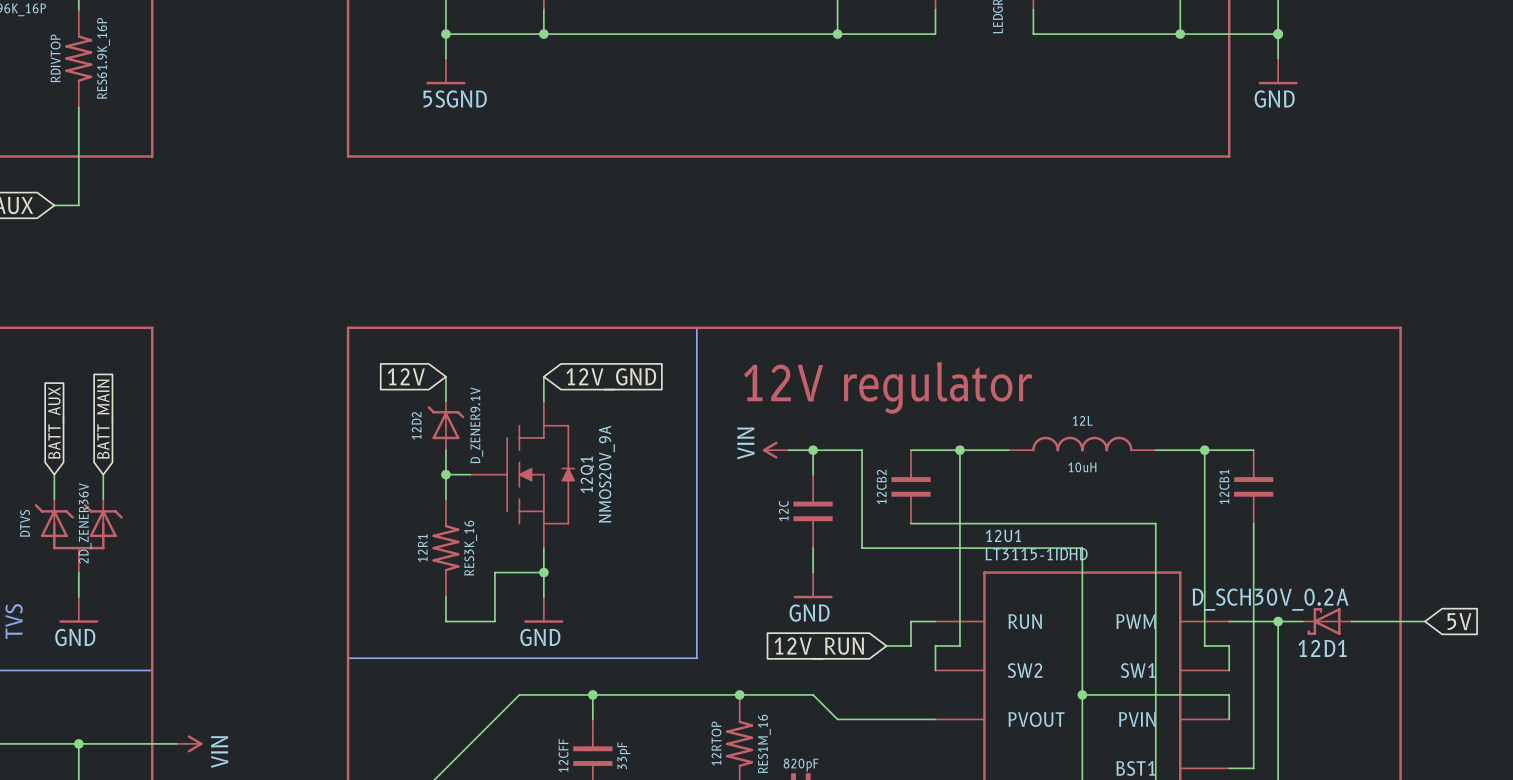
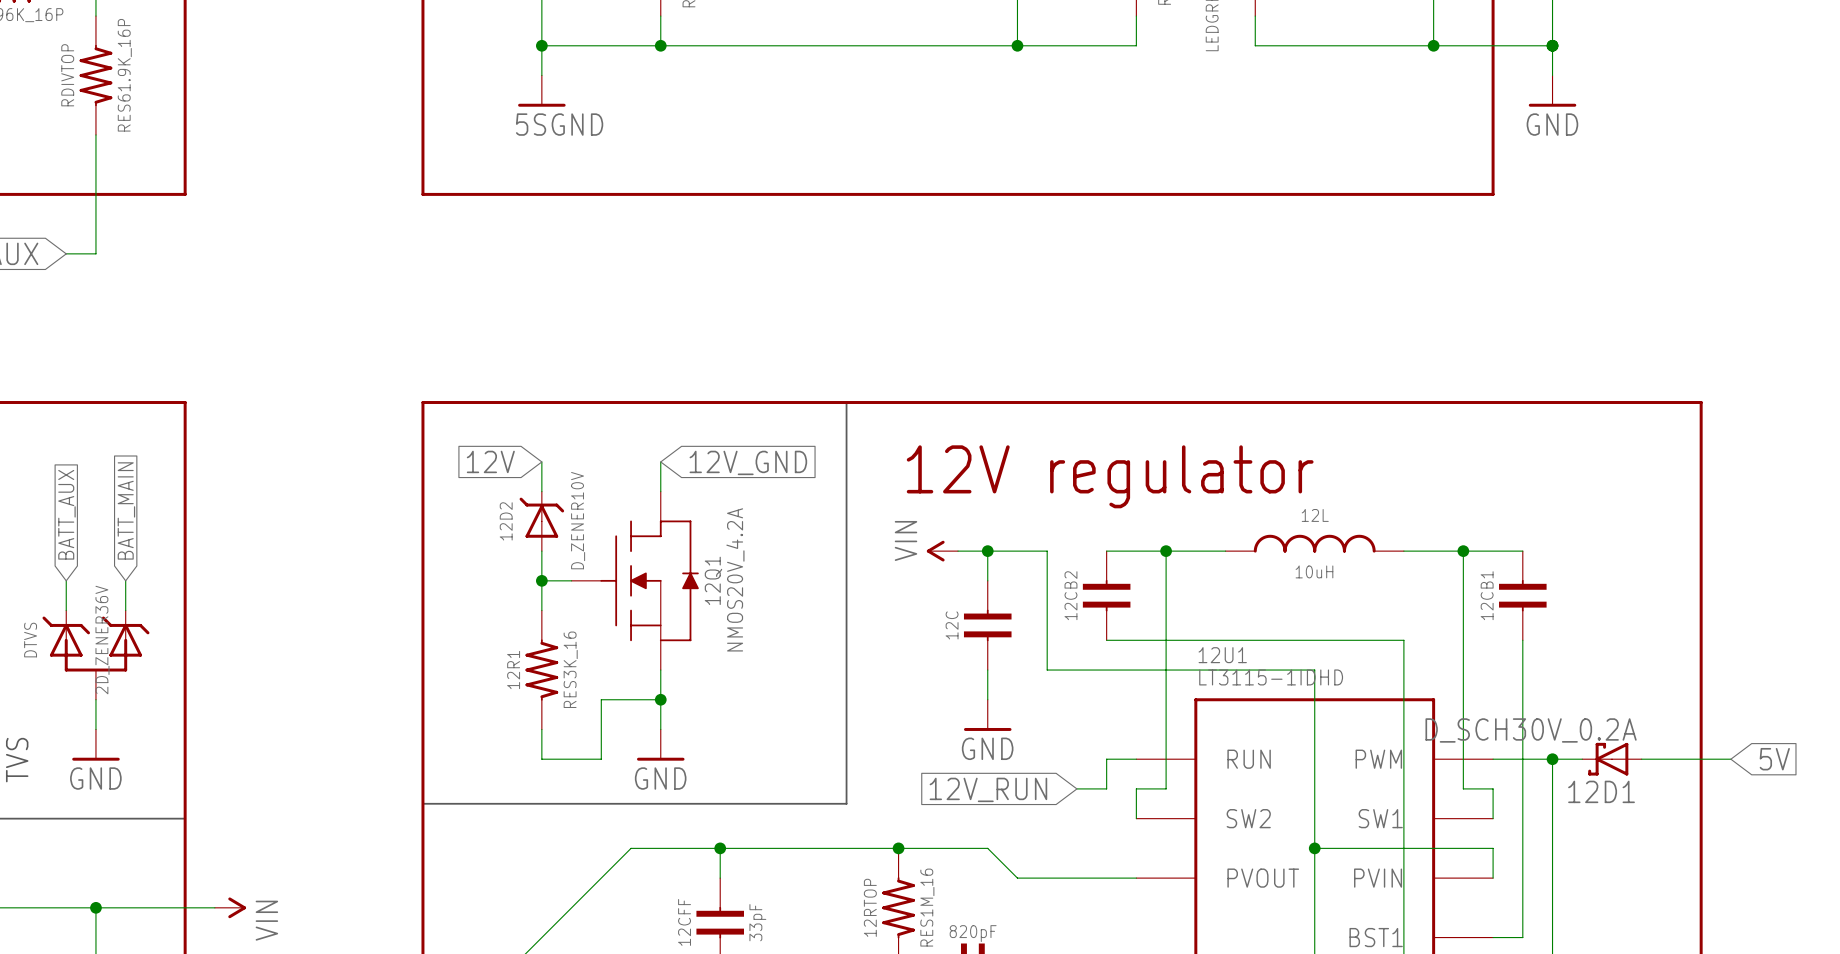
12D2 value: D_ZENER9.1V (476, 425) -> D_ZENER10V (578, 520)
12Q1 value: NMOS20V_9A (606, 474) -> NMOS20V_4.2A (735, 579)

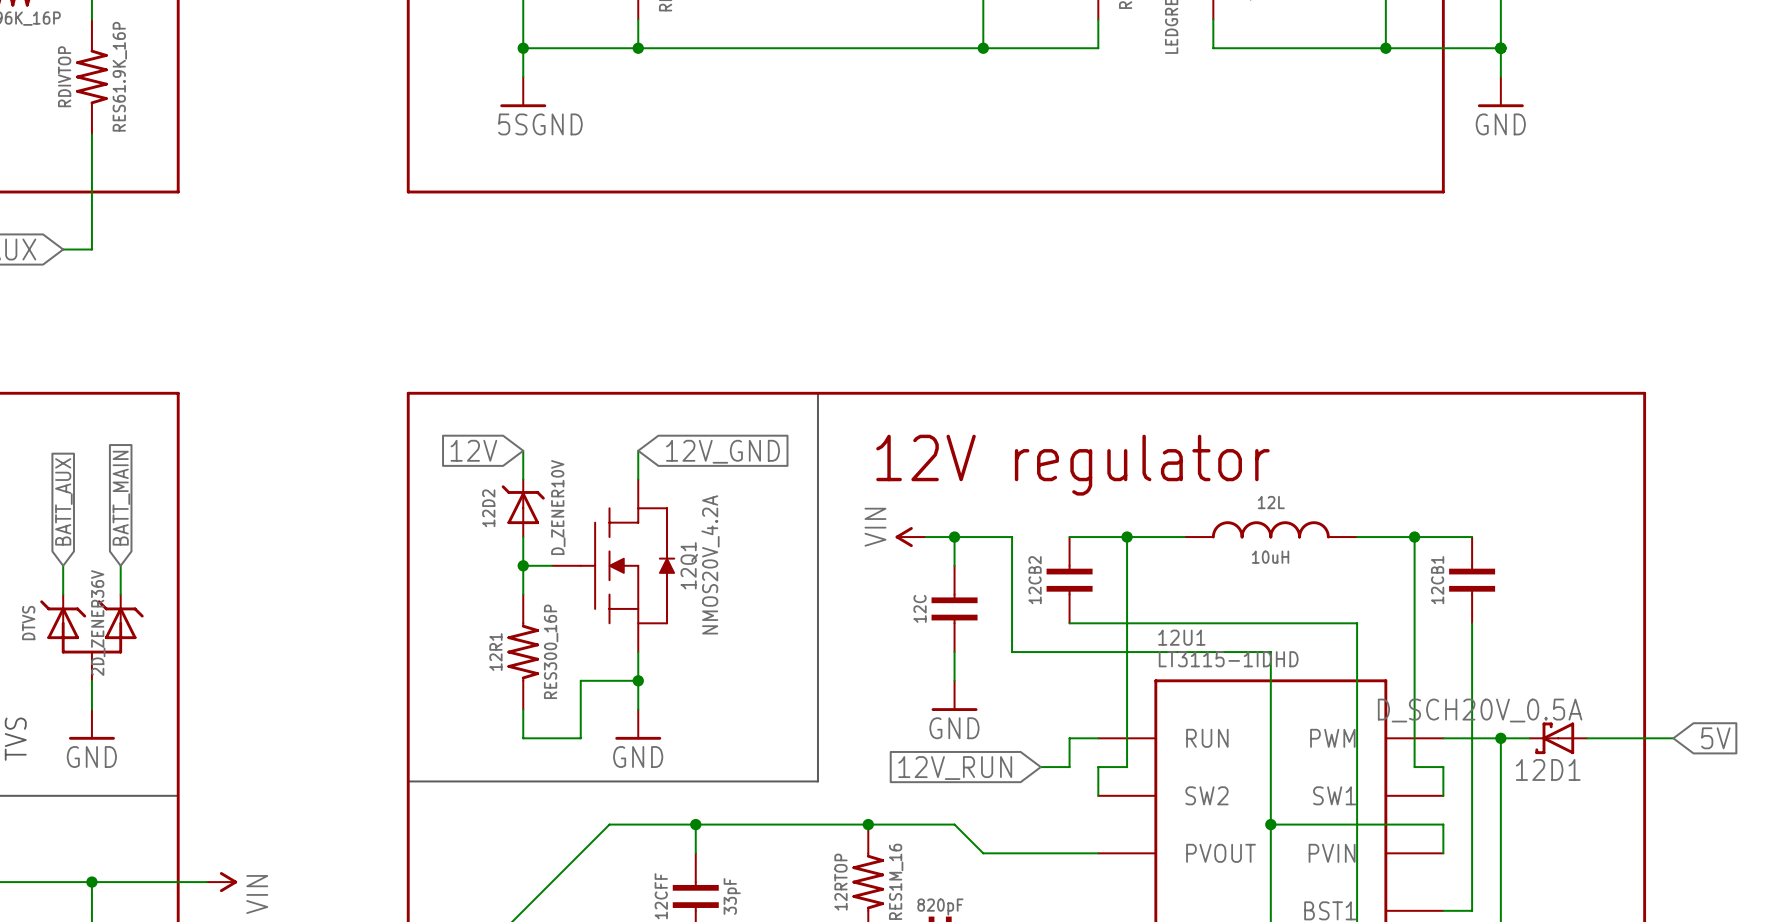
12R1 value: RES3K_16 (570, 669) -> RES300_16P (551, 651)
12D1 value: D_SCH30V_0.2A (1531, 730) -> D_SCH20V_0.5A (1480, 710)

